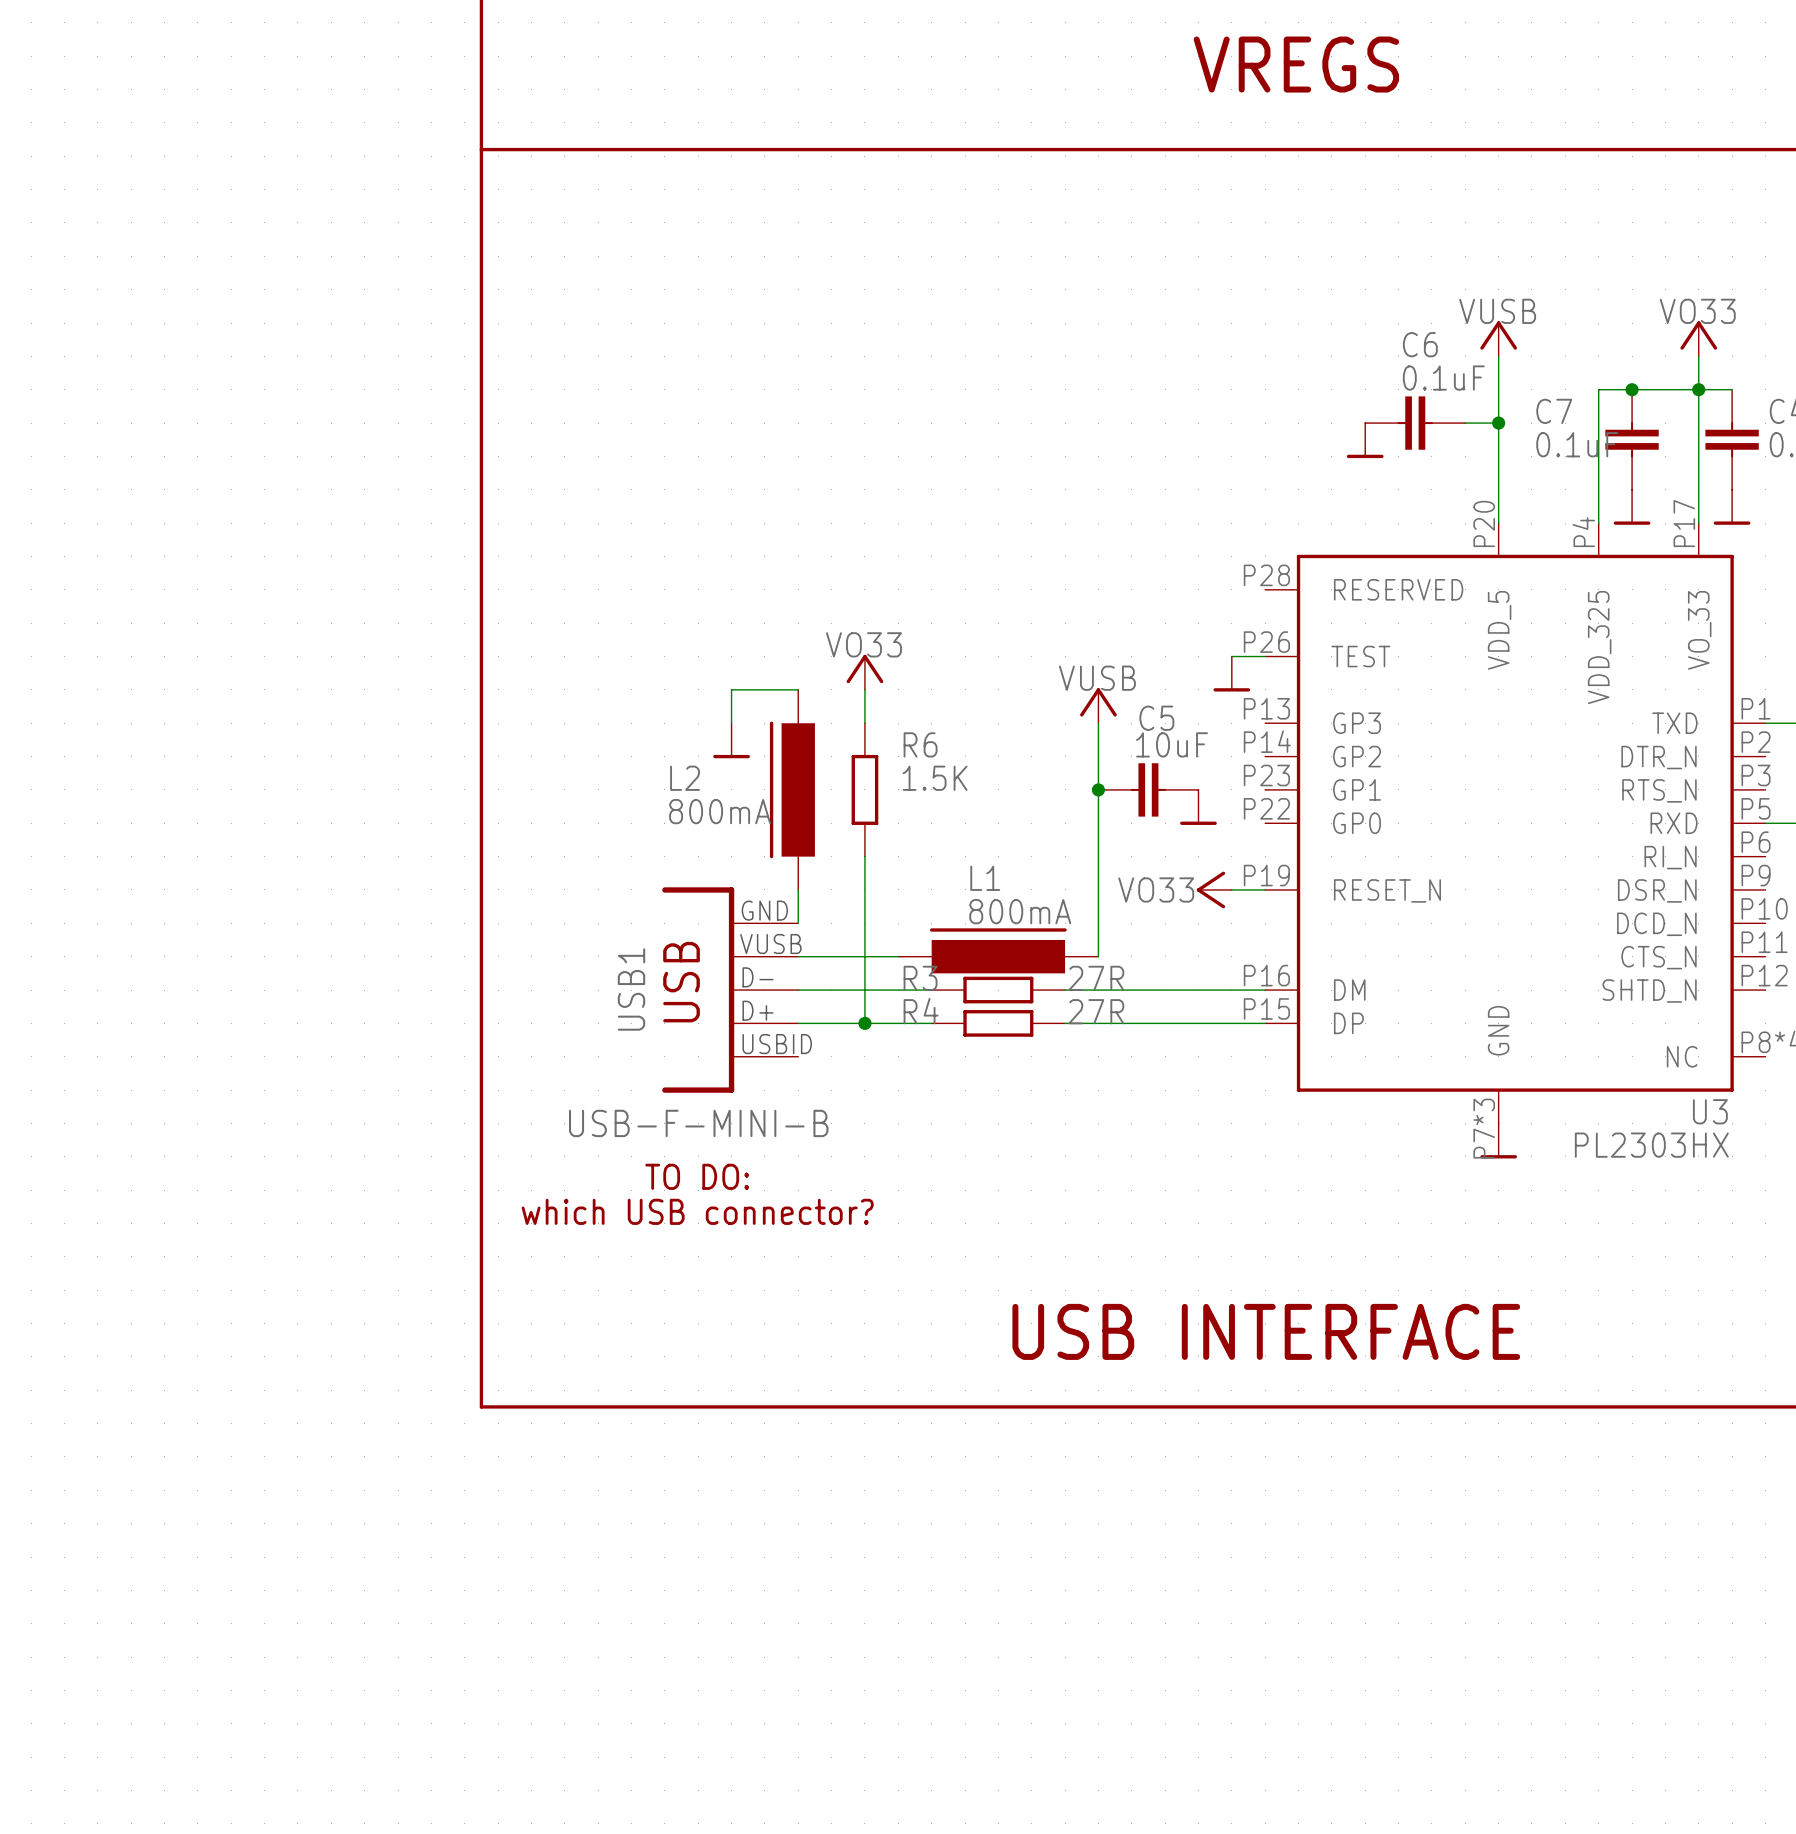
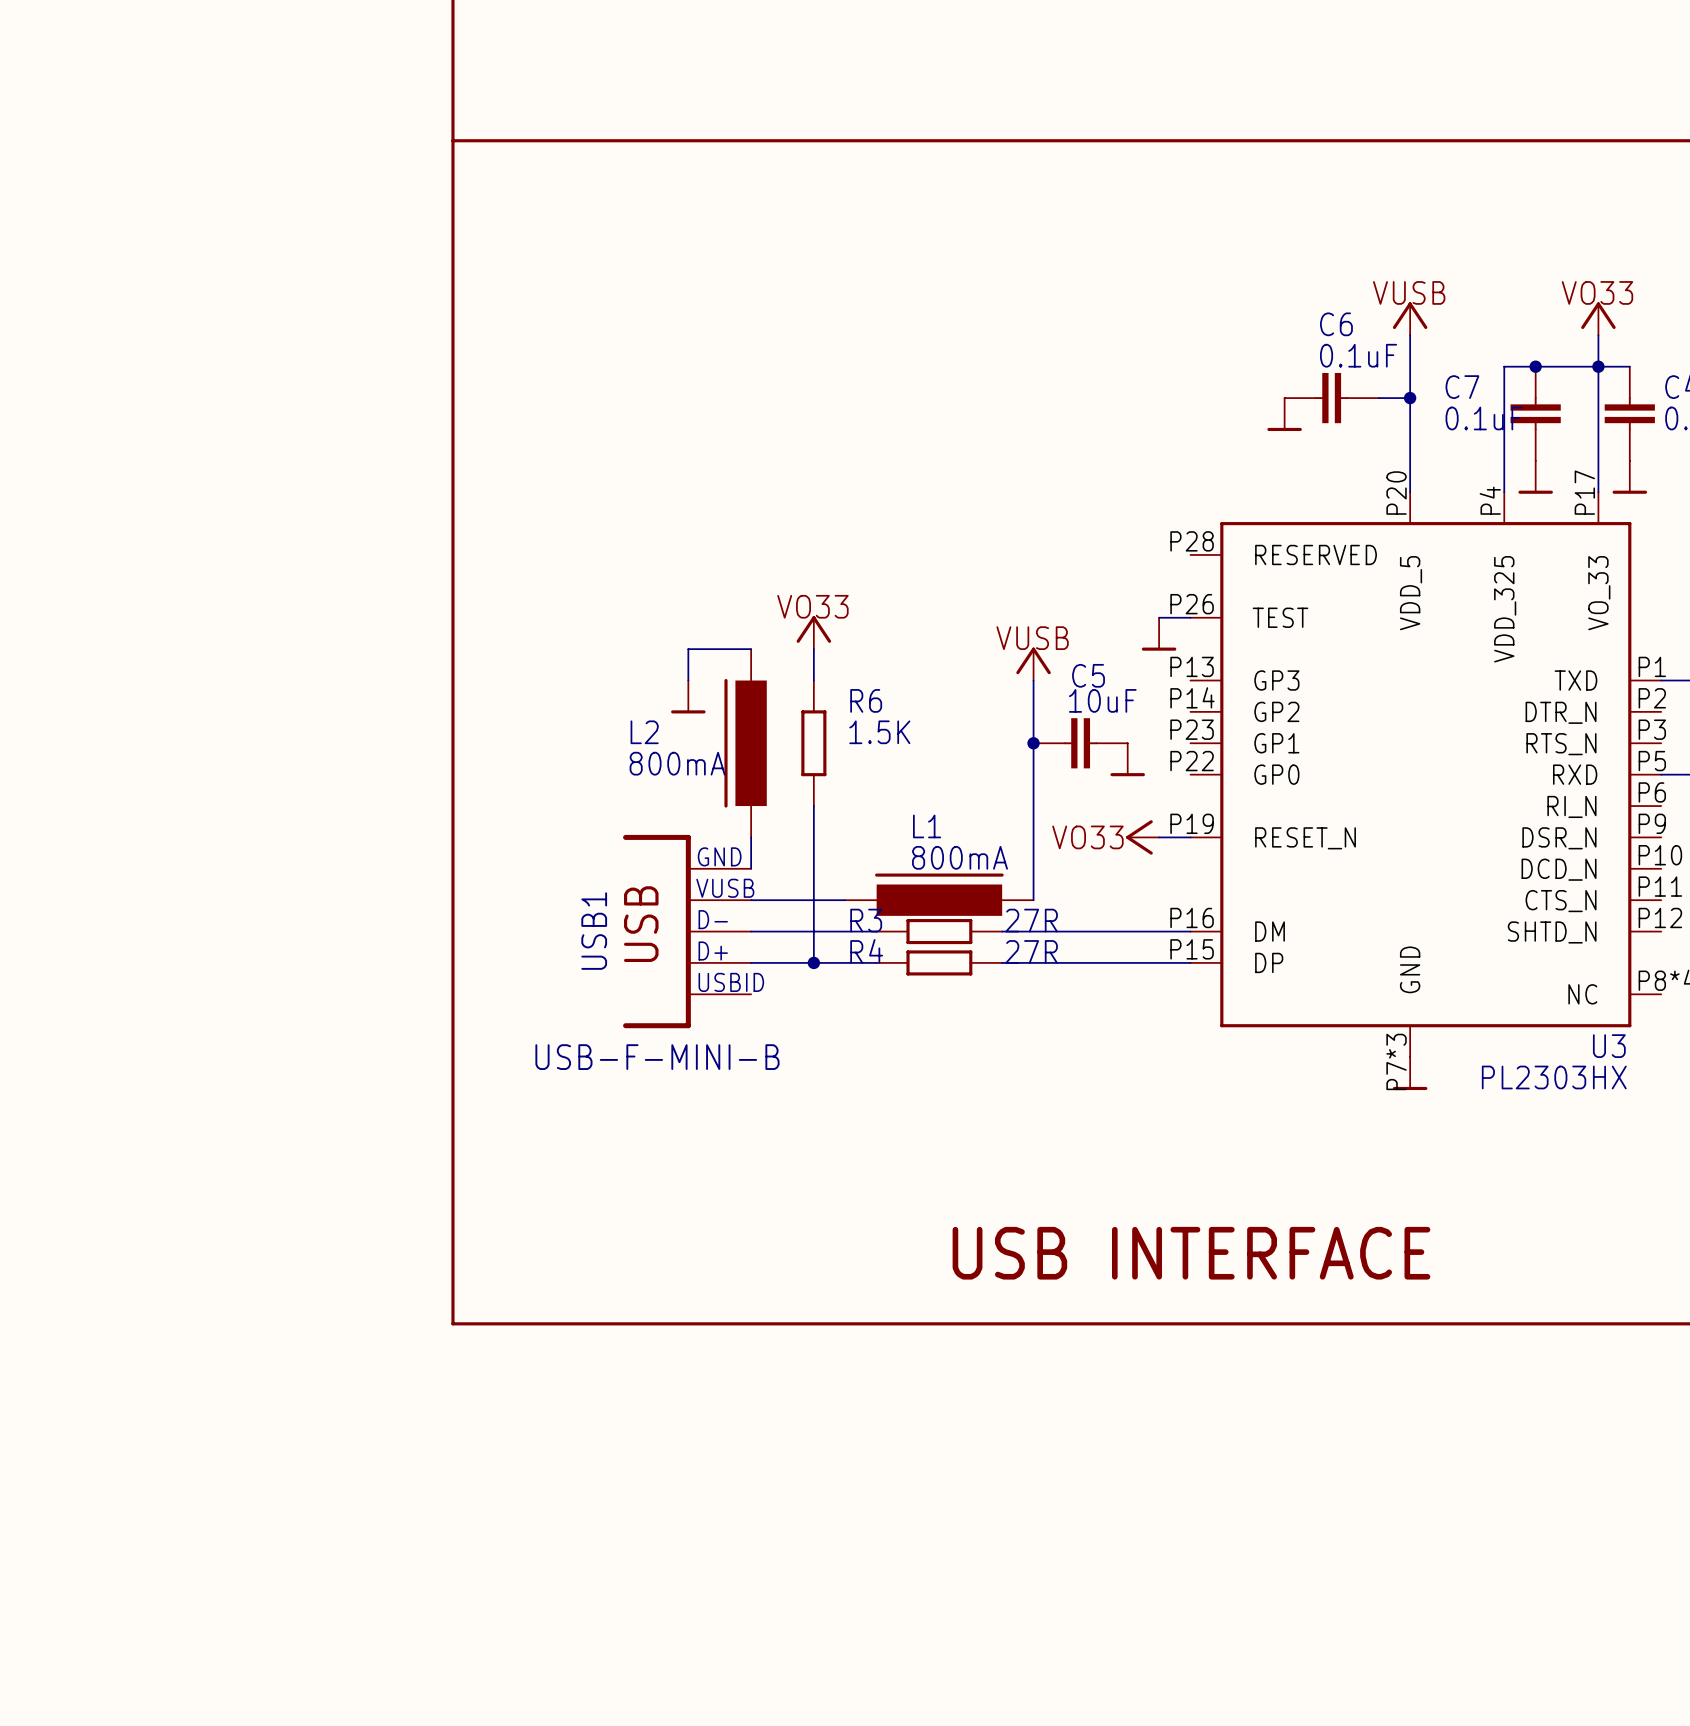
text: VREGS (1296, 64) -> none
text: TO DO: (697, 1176) -> none
text: which USB connector? (697, 1211) -> none

